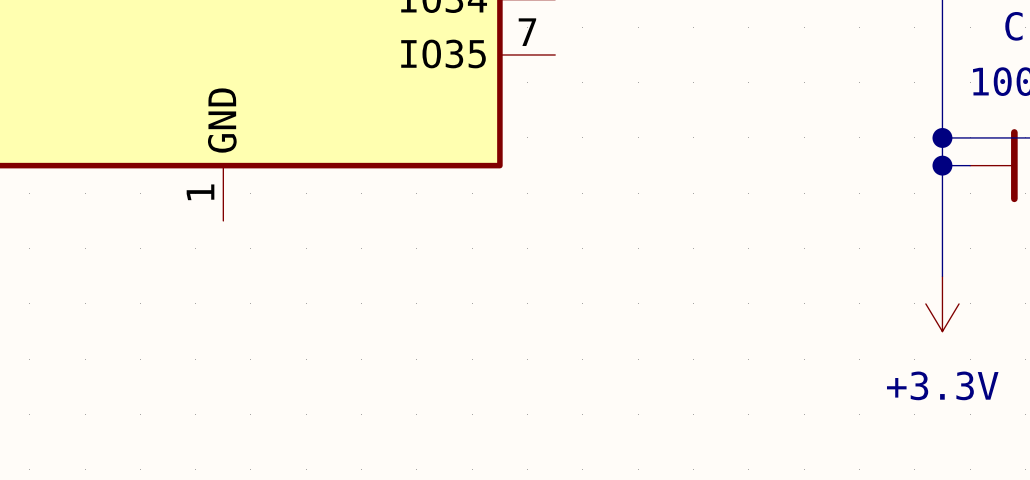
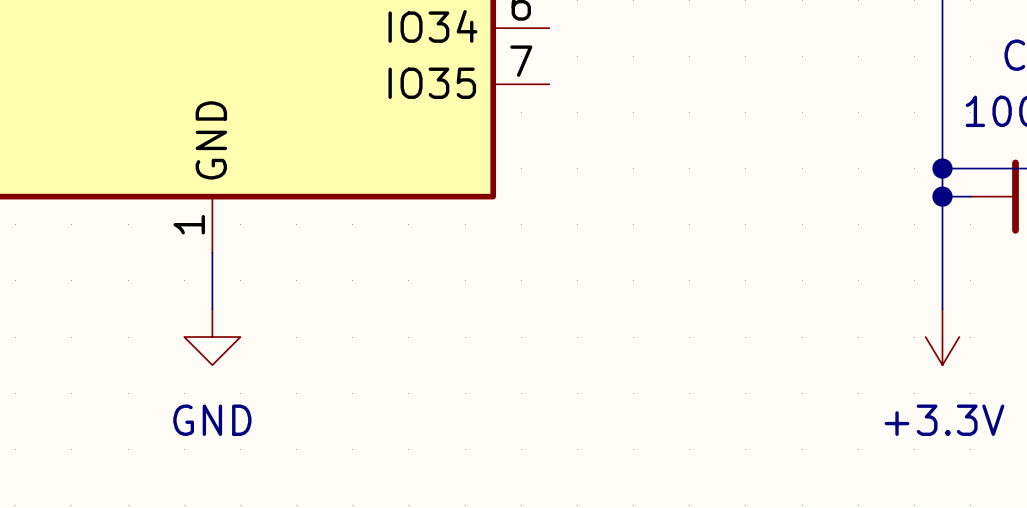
wire: none -> (212, 252) (212, 308)
power symbol: none -> GND (212, 337)

